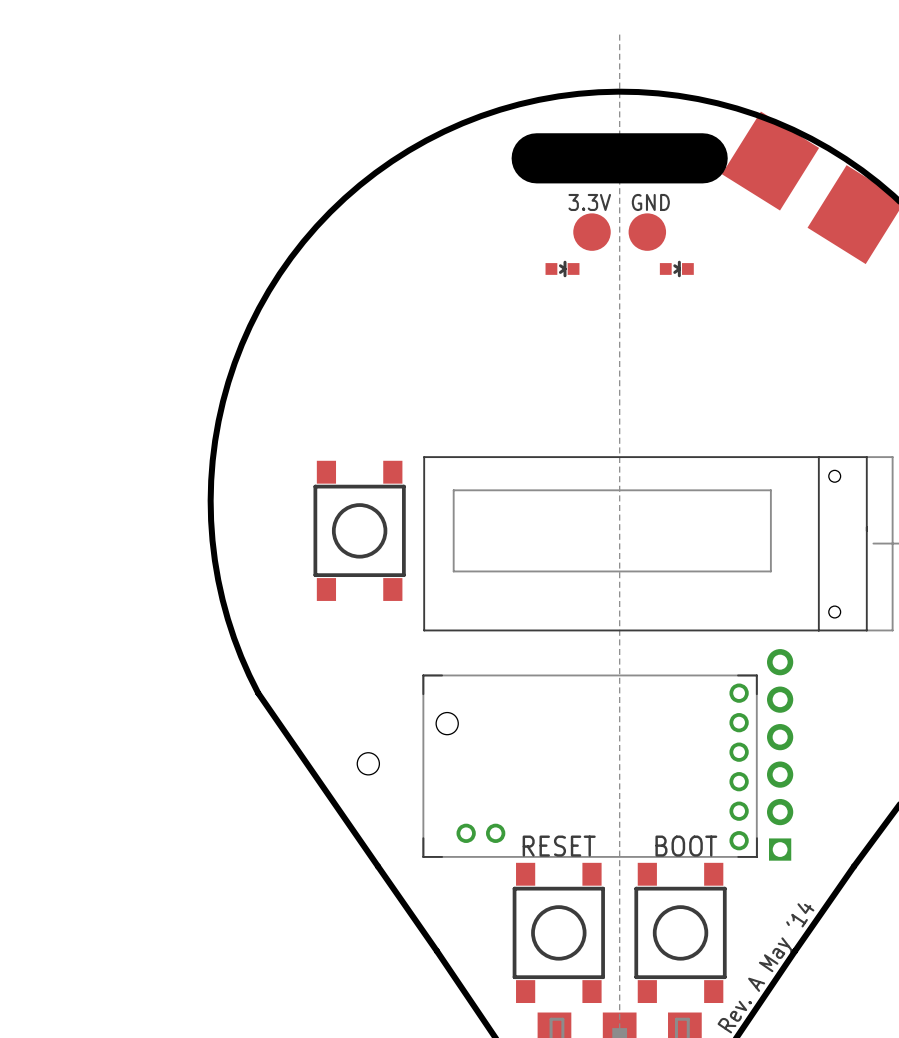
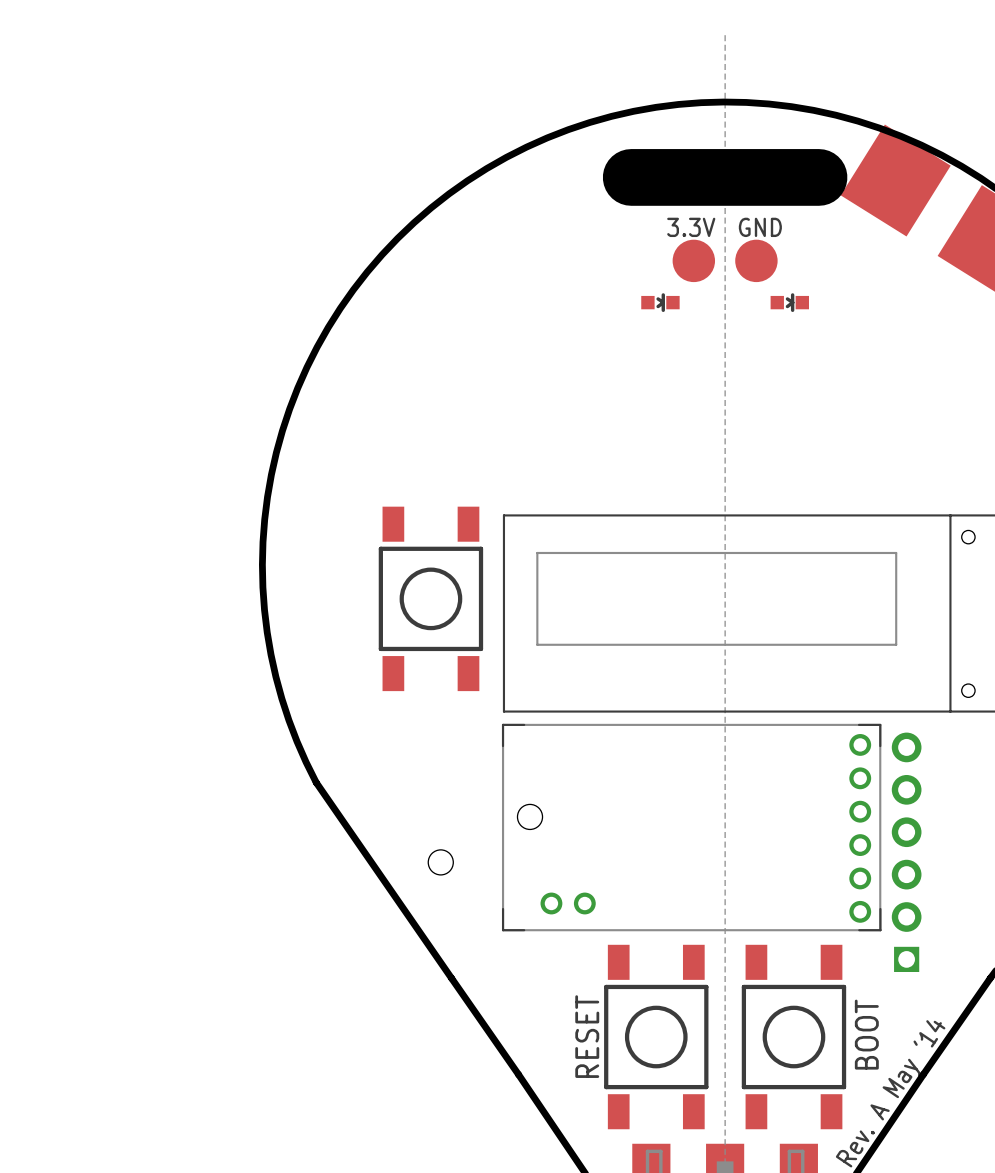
part footprint: [313, 460, 406, 601] -> [378, 506, 484, 692]
part position: (590, 766) -> (691, 827)
text rotation: 0° (559, 846) -> 90° counterclockwise (587, 1036)
text position: RESET (559, 846) -> RESET (587, 1036)
text rotation: 0° (686, 846) -> 90° counterclockwise (866, 1034)
text position: BOOT (686, 846) -> BOOT (866, 1034)
part footprint: [512, 862, 605, 1004] -> [604, 944, 709, 1130]
part footprint: [634, 862, 727, 1004] -> [741, 944, 847, 1130]

